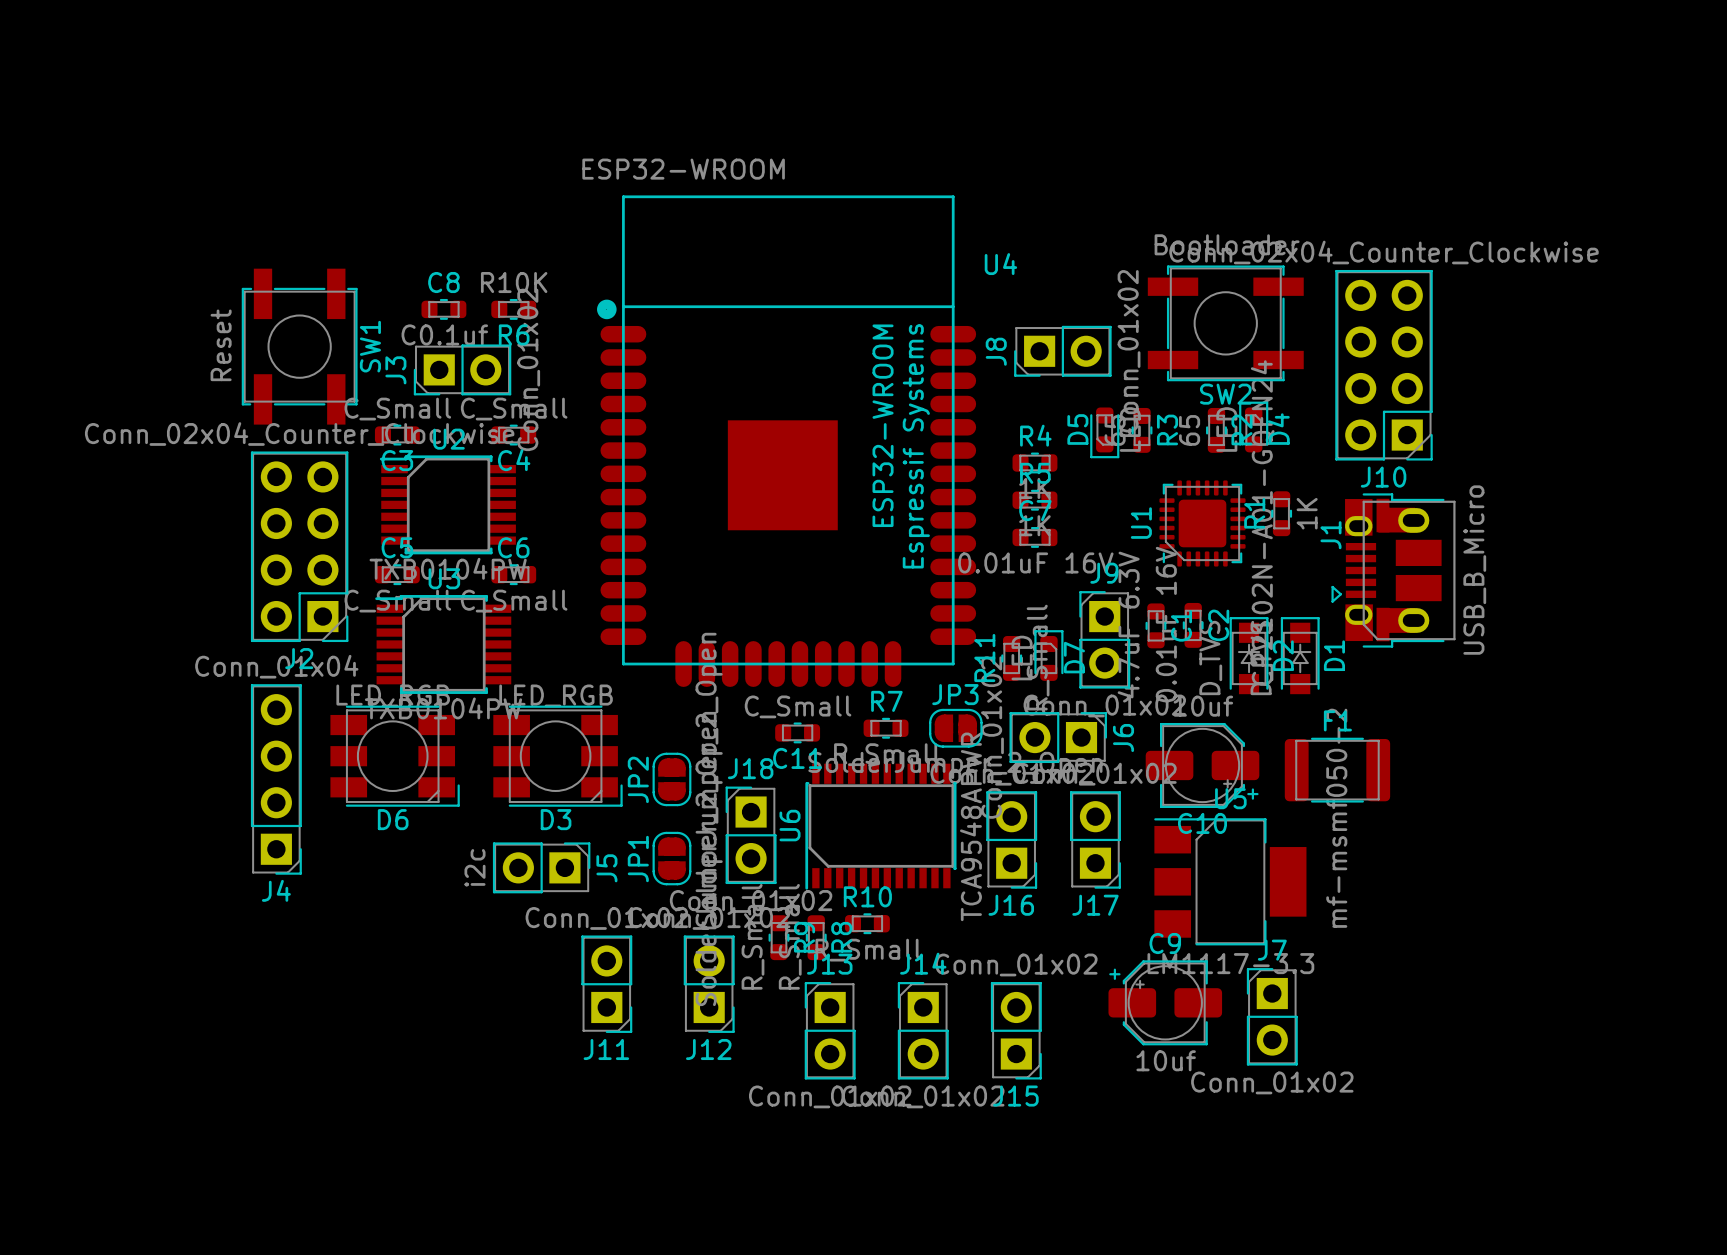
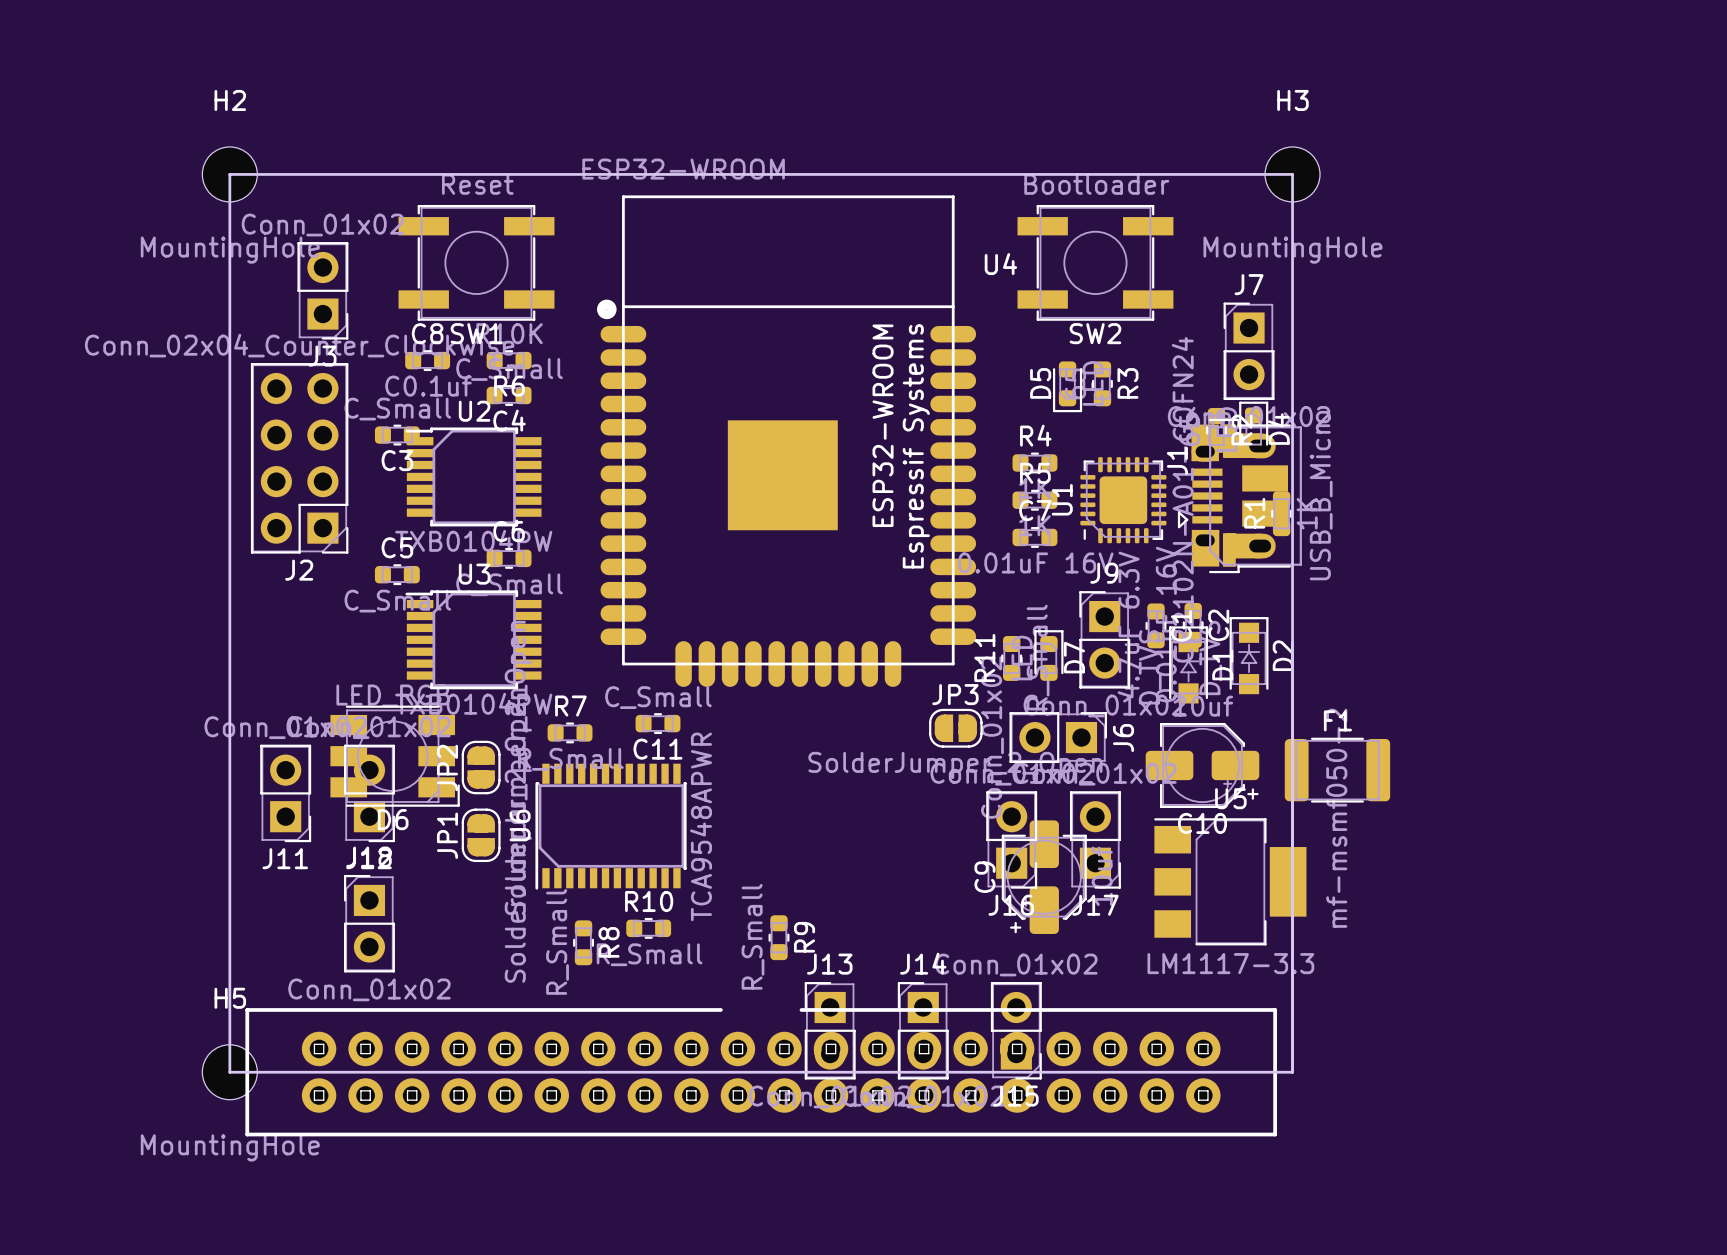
board edge: none -> (229, 174) (229, 1072) (1292, 1072) (1292, 174) (229, 174)
H2: none -> MountingHole (229, 174)
H3: none -> MountingHole (1292, 174)
C8 position: (443, 309) -> (427, 360)
R6 position: (513, 309) -> (509, 360)
SW2 position: (1225, 323) -> (1095, 262)
SW1 rotation: 0° (299, 346) -> 90° clockwise (476, 262)
SW1 position: (299, 346) -> (476, 262)
J8: Conn_01x02 (1062, 351) -> none
J10: Conn_02x04_Counter_Clockwise (1384, 365) -> none
J3 rotation: 0° (462, 369) -> 90° counterclockwise (322, 290)
J3 position: (462, 369) -> (322, 290)
R3 position: (1142, 430) -> (1102, 383)
D5 position: (1104, 432) -> (1067, 386)
C4 position: (513, 435) -> (509, 395)
U2 position: (447, 504) -> (473, 476)
U1 position: (1202, 523) -> (1123, 500)
J2 position: (299, 546) -> (299, 458)
J1 position: (1393, 570) -> (1239, 496)
C6 position: (513, 574) -> (509, 558)
U3 position: (443, 644) -> (473, 639)
D1 position: (1300, 655) -> (1188, 664)
R7 position: (886, 728) -> (570, 732)
C11 position: (797, 732) -> (658, 723)
D3: LED_RGB (557, 756) -> none
J4: Conn_01x04 (276, 779) -> none
JP2 position: (671, 779) -> (481, 767)
U6 position: (880, 826) -> (611, 826)
J18 position: (751, 835) -> (369, 923)
JP1 position: (671, 858) -> (481, 835)
J5: i2c (541, 867) -> none
R10 position: (867, 923) -> (648, 928)
R8 position: (816, 937) -> (583, 942)
J11 position: (606, 984) -> (285, 793)
J12 position: (709, 984) -> (369, 793)
C9 rotation: 0° (1165, 1002) -> 90° counterclockwise (1044, 877)
C9 position: (1165, 1002) -> (1044, 877)
J7 position: (1272, 1016) -> (1249, 351)
H5: none -> MountingHole (229, 1072)
part: none -> (761, 1072)

